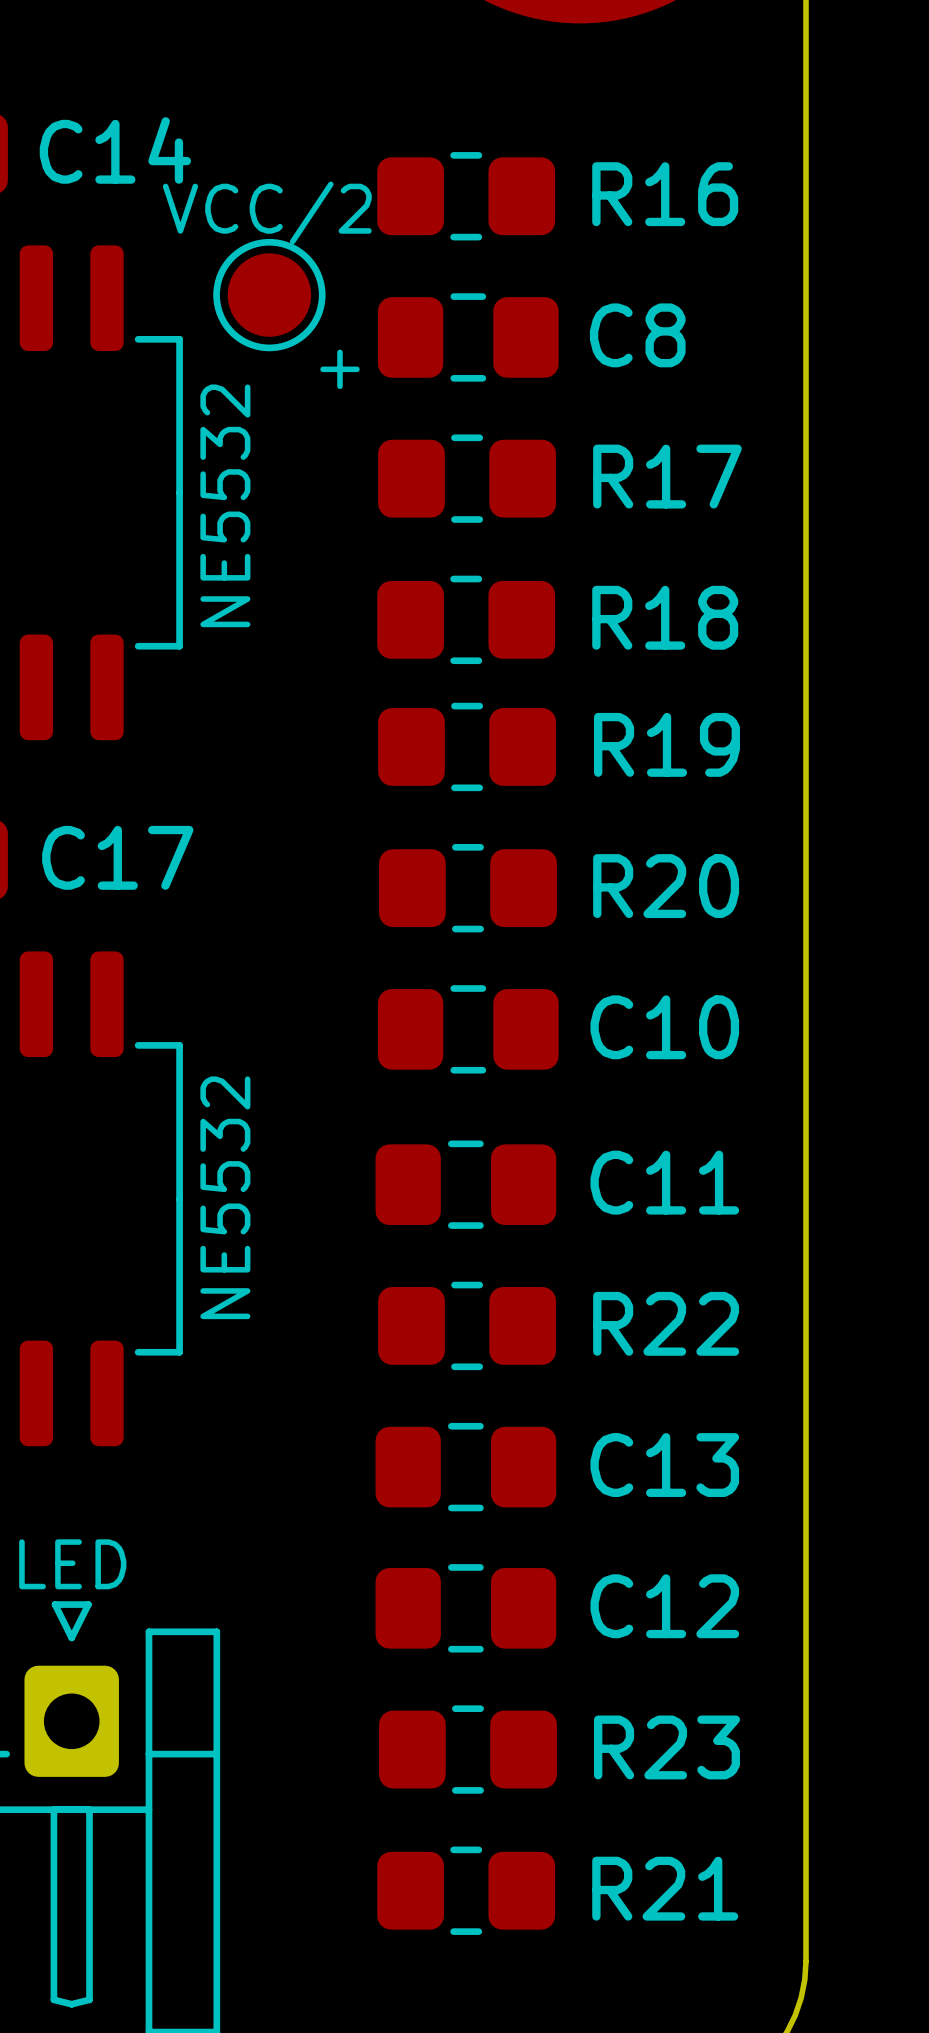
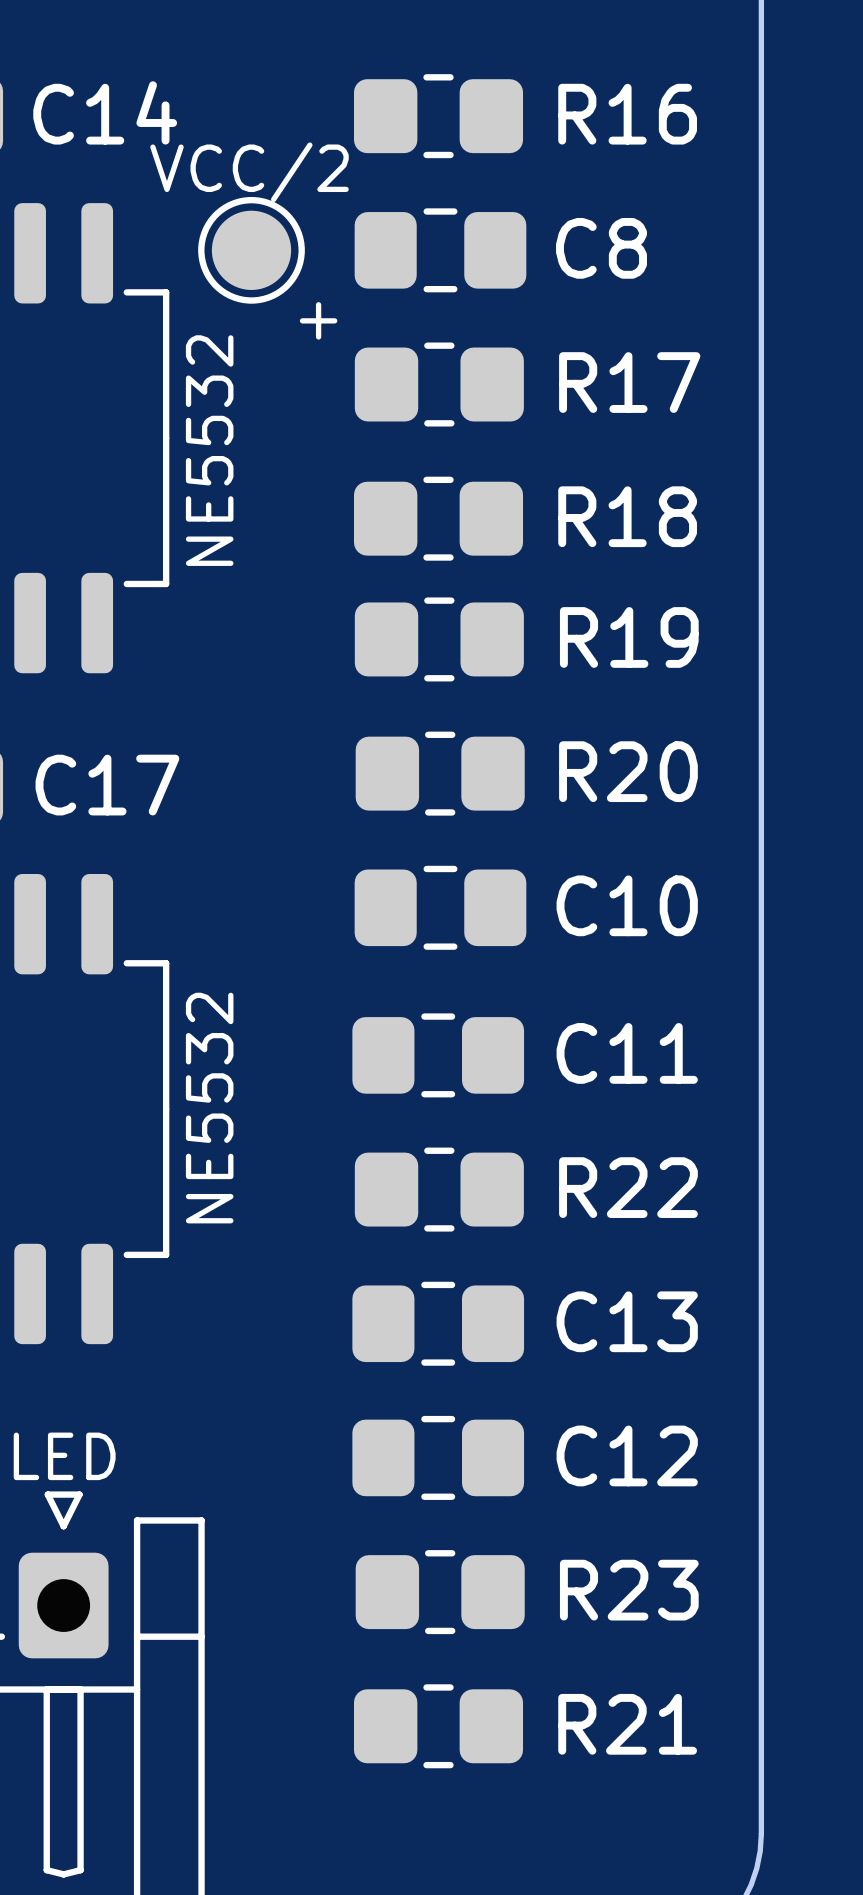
R16 position: (466, 196) -> (438, 116)
C8 position: (468, 337) -> (440, 250)
R17 position: (467, 478) -> (439, 384)
R18 position: (466, 619) -> (438, 518)
R19 position: (467, 746) -> (439, 639)
R20 position: (467, 888) -> (440, 773)
C10 position: (468, 1029) -> (440, 907)
C11 position: (465, 1184) -> (438, 1055)
R22 position: (467, 1325) -> (439, 1189)
C13 position: (465, 1467) -> (438, 1323)
C12 position: (465, 1608) -> (438, 1457)
R23 position: (467, 1749) -> (440, 1592)
R21 position: (466, 1890) -> (438, 1726)

